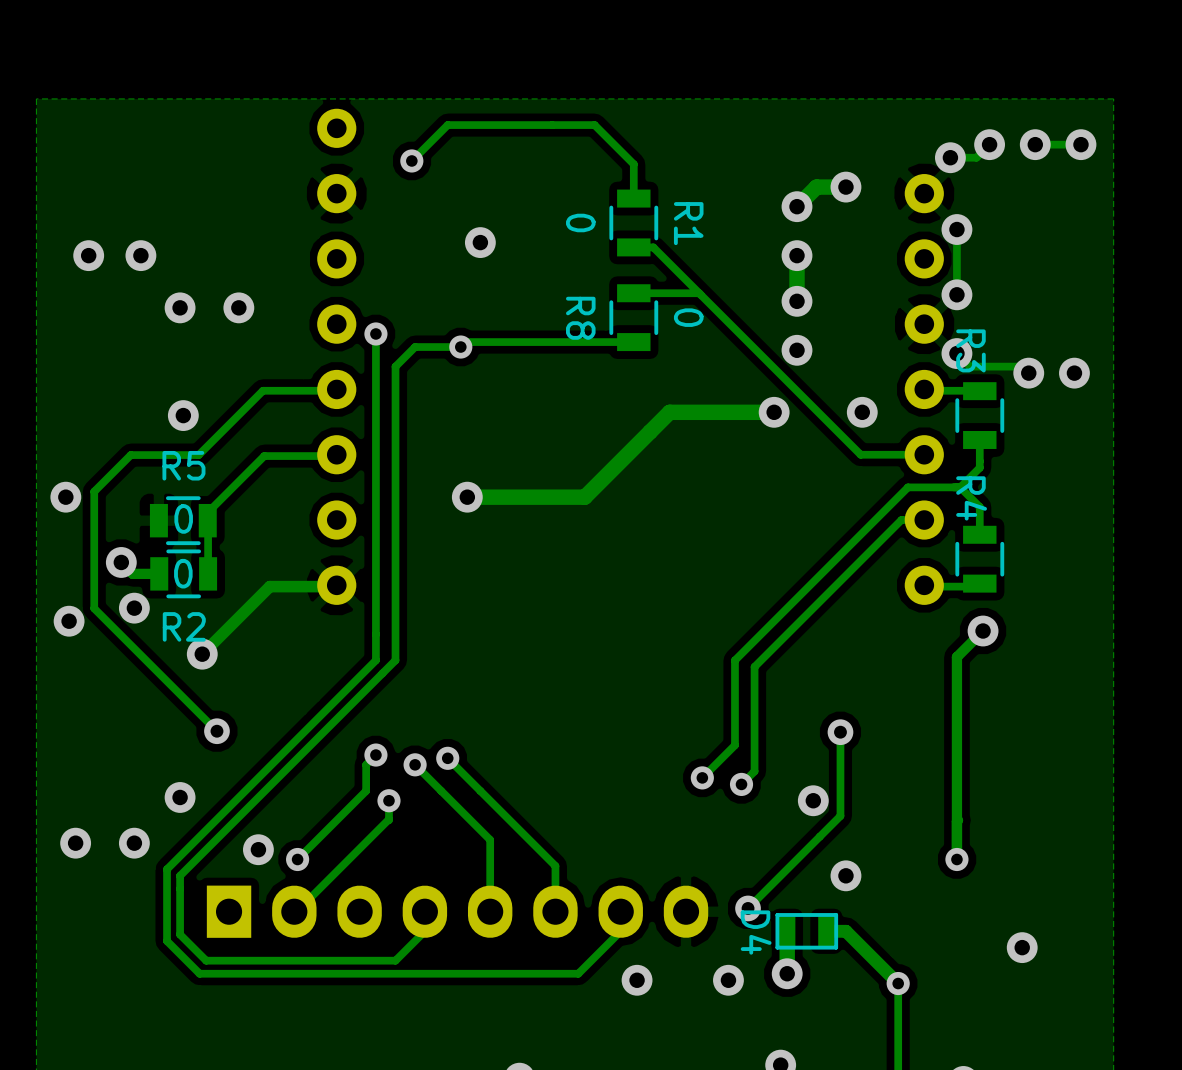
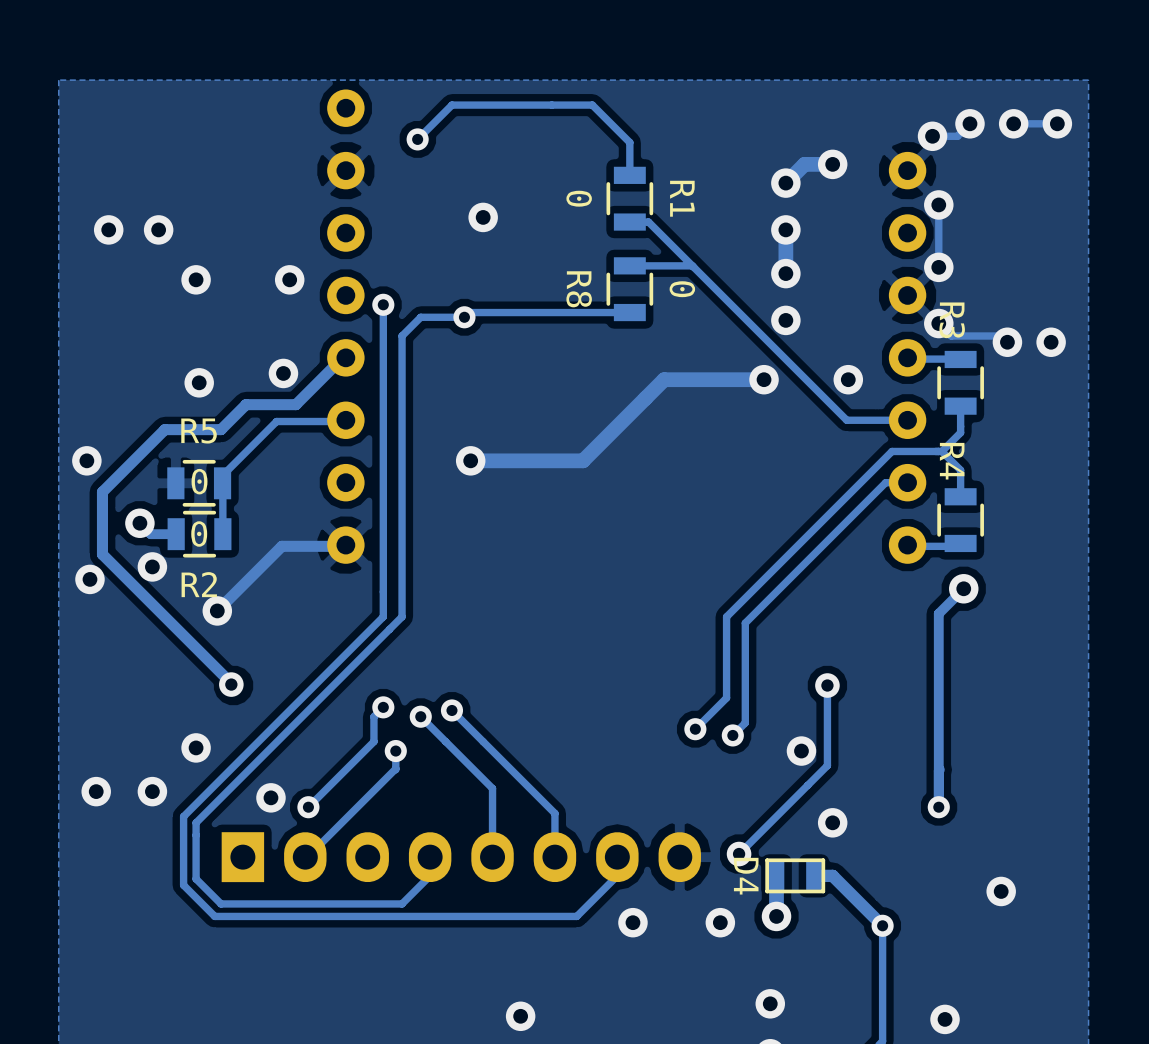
via position: (238, 307) -> (289, 279)
track: none -> (345, 357) (342, 357) (295, 404) (246, 404) (221, 429) (164, 429) (102, 492) (102, 554) (233, 685)
track: (338, 390) (262, 390) (198, 455) (130, 455) (94, 491) (94, 608) (216, 731) -> none
via: none -> (283, 373)

